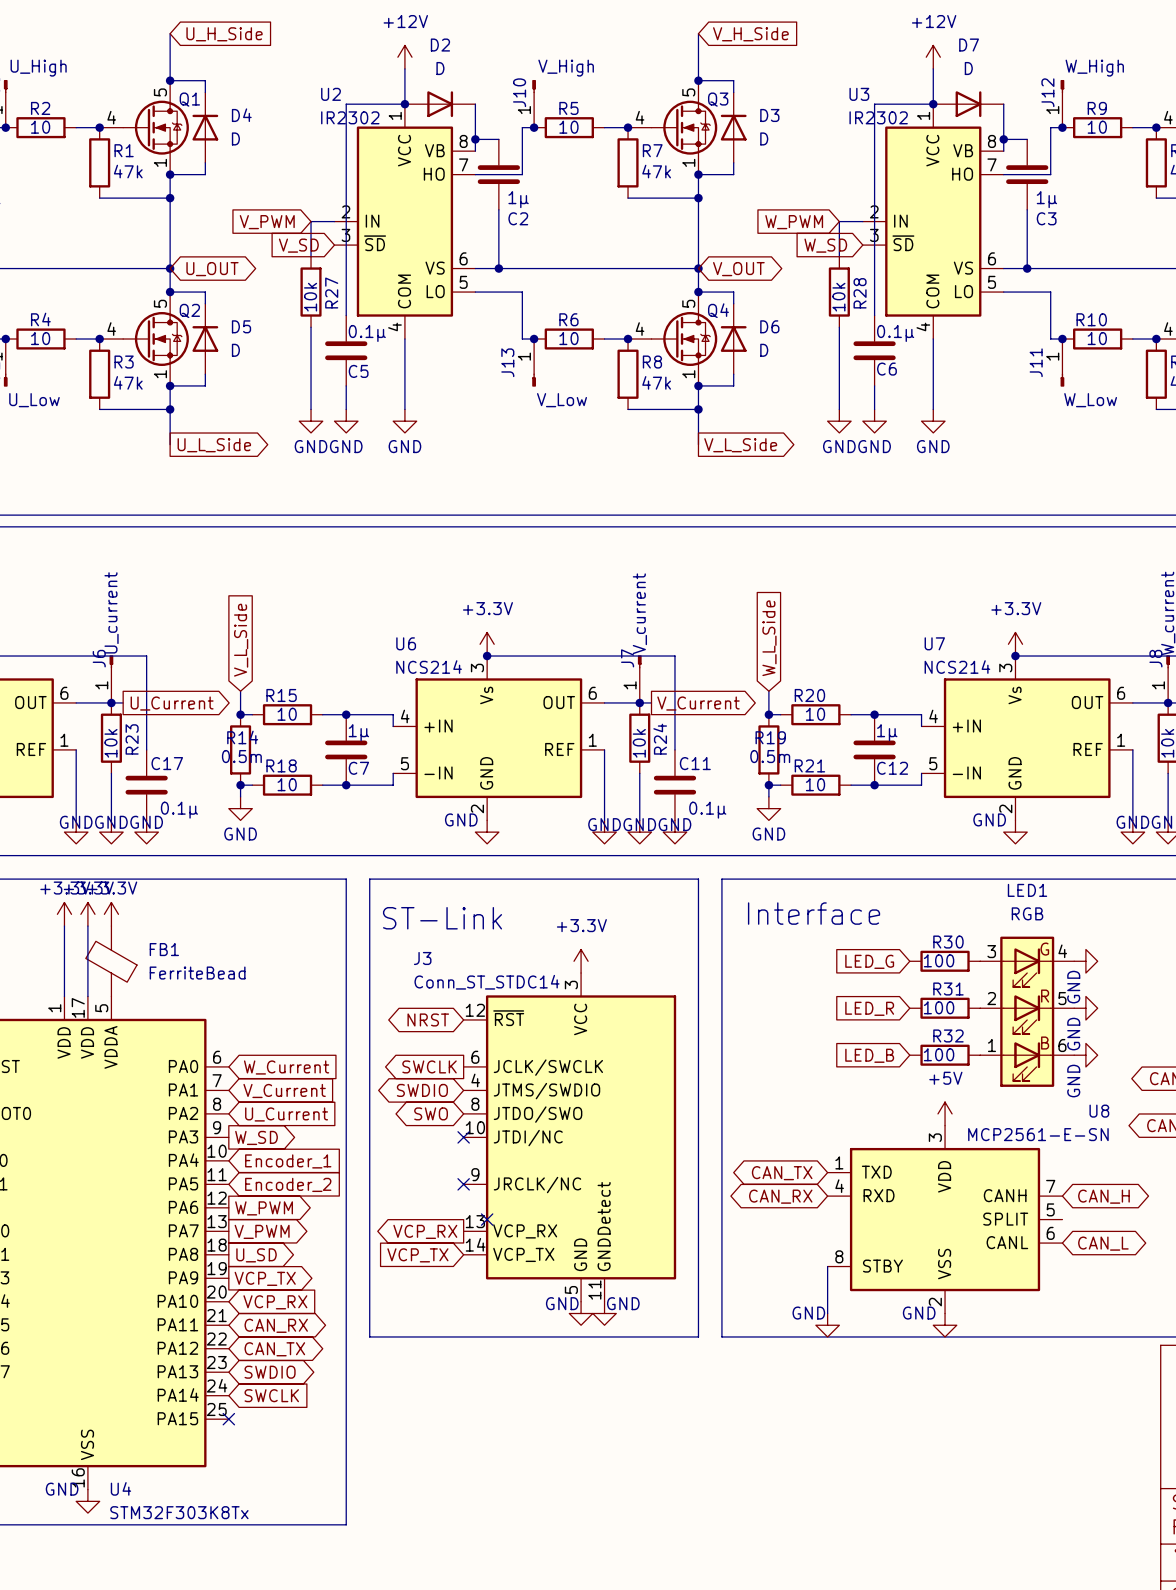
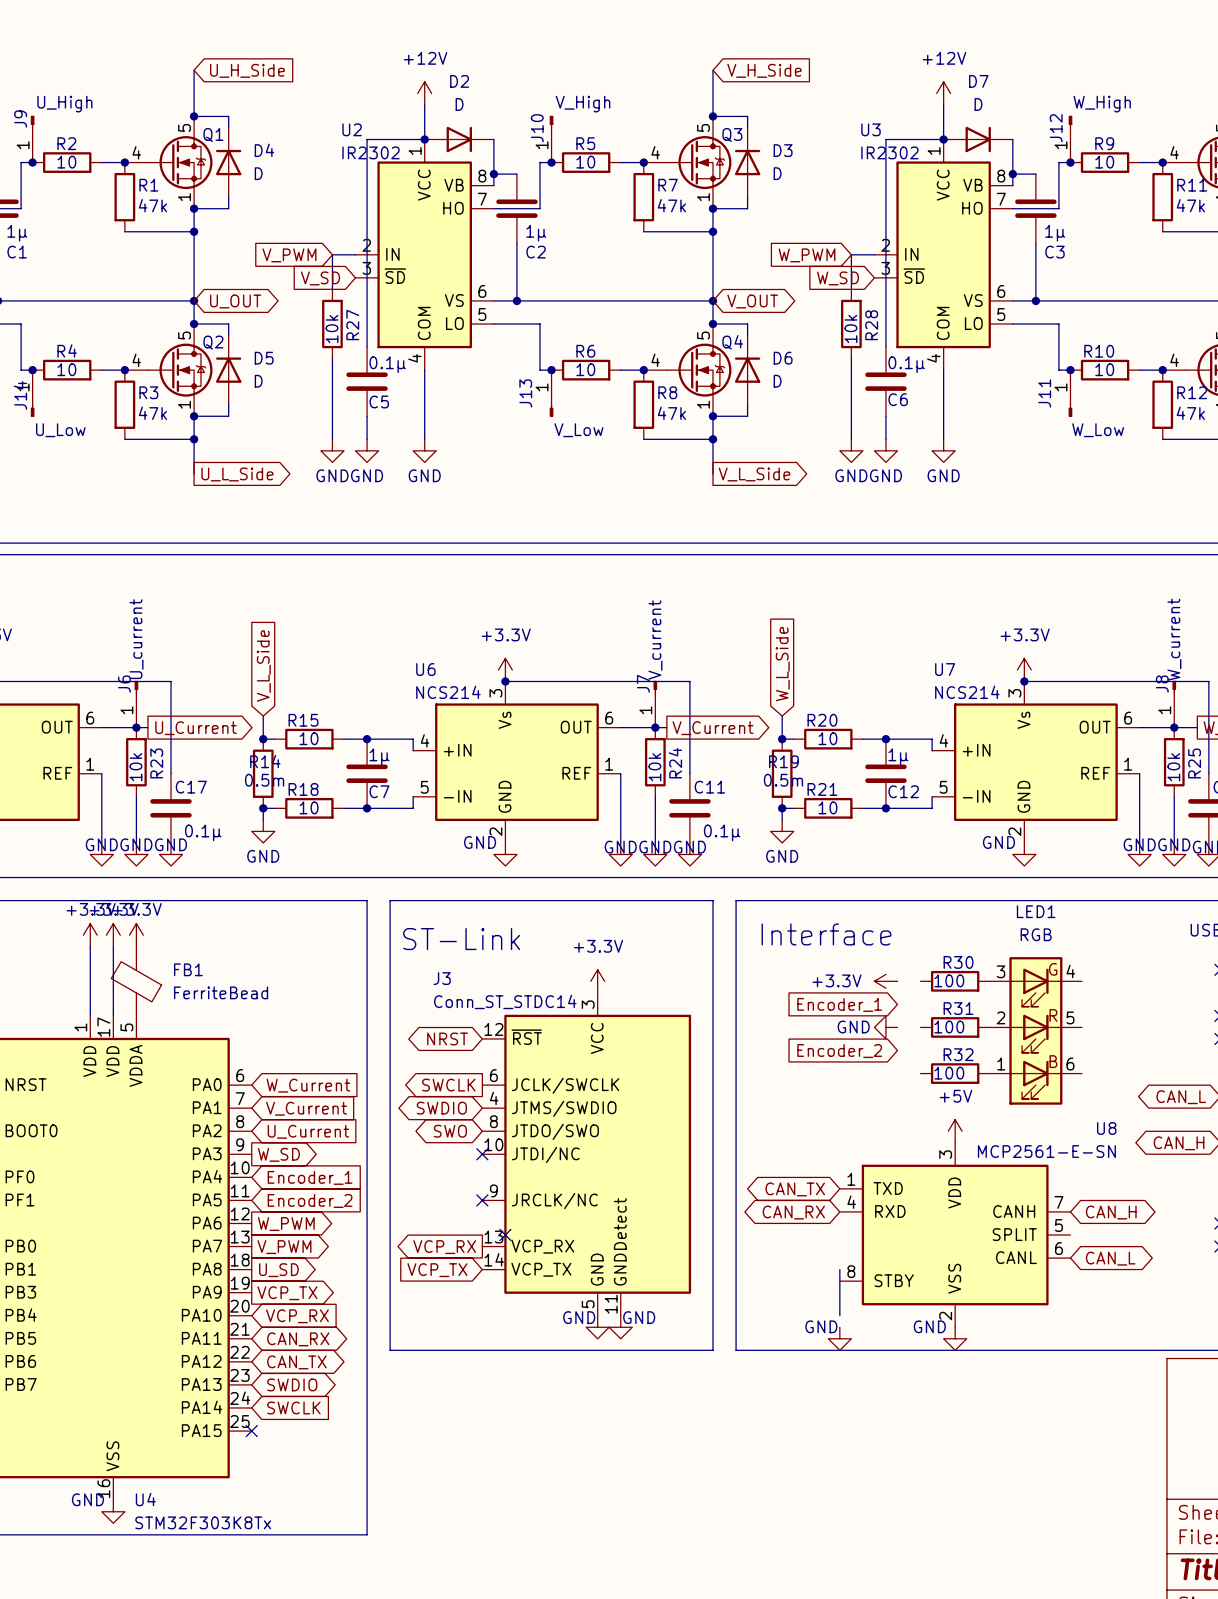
global label: LED_G (869, 961) -> none
power symbol: none -> +3.3V (885, 981)
power symbol: GND (1085, 961) -> none
global label: none -> Encoder_1 (839, 1004)
global label: LED_R (869, 1008) -> none
power symbol: none -> GND (885, 1027)
power symbol: GND (1085, 1008) -> none
global label: none -> Encoder_2 (839, 1051)
global label: LED_B (869, 1055) -> none
power symbol: GND (1085, 1055) -> none
wire: (827, 1301) (827, 1313) -> (839, 1269) (839, 1281)

